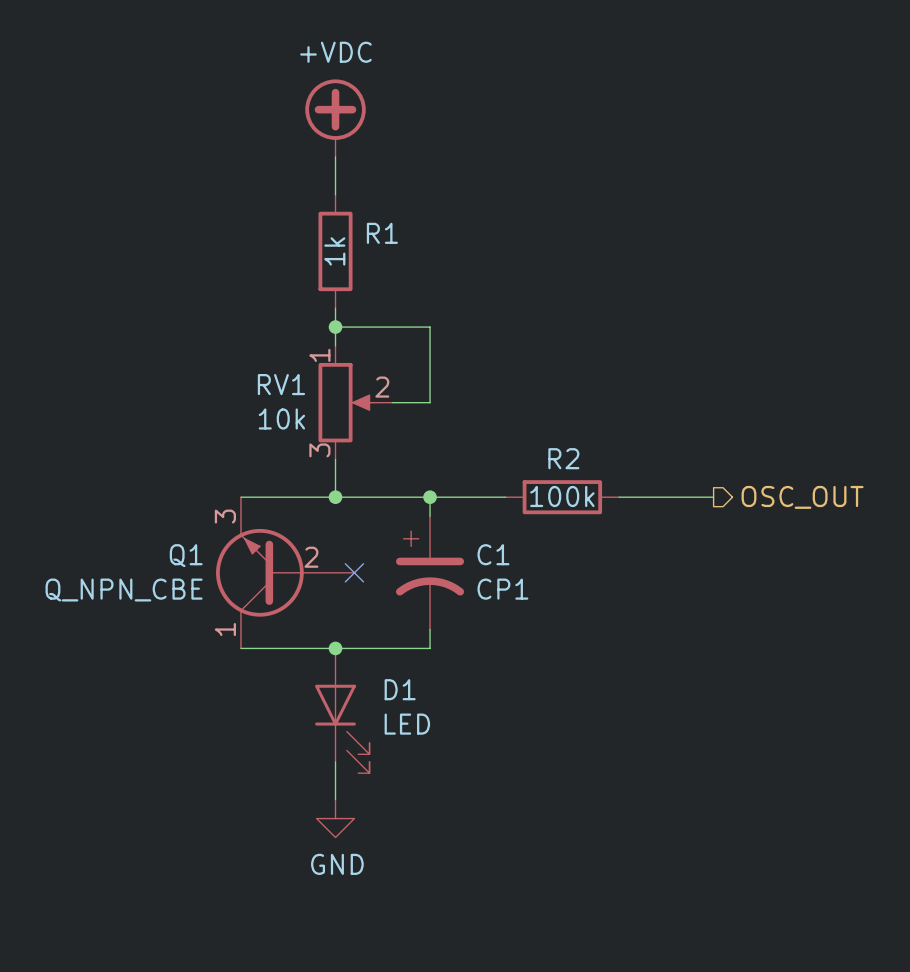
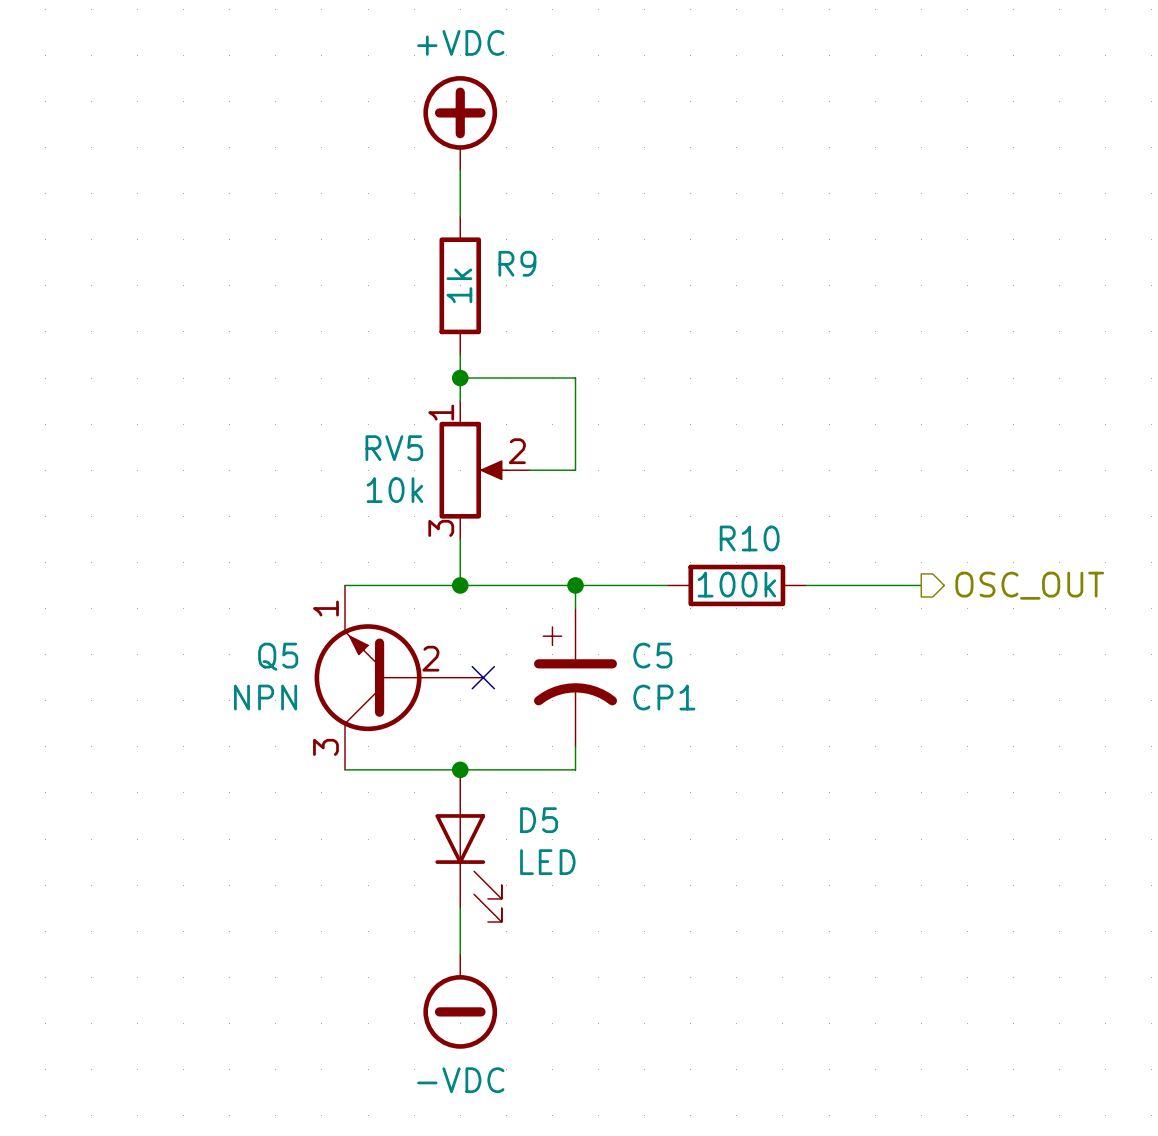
R1 name: R1 (382, 233) -> R9 (517, 263)
RV1 name: RV1 (281, 384) -> RV5 (394, 448)
R2 name: R2 (563, 458) -> R10 (749, 538)
Q1 pin number: 3 (225, 516) -> 1 (325, 608)
C1 name: C1 (493, 554) -> C5 (652, 655)
Q1 name: Q1 (186, 555) -> Q5 (278, 656)
Q1 value: Q_NPN_CBE (124, 590) -> NPN (265, 697)
Q1 pin number: 1 (225, 629) -> 3 (325, 747)
D1 name: D1 (400, 689) -> D5 (539, 820)
power symbol: GND (335, 818) -> none
power symbol: none -> -VDC (460, 1001)

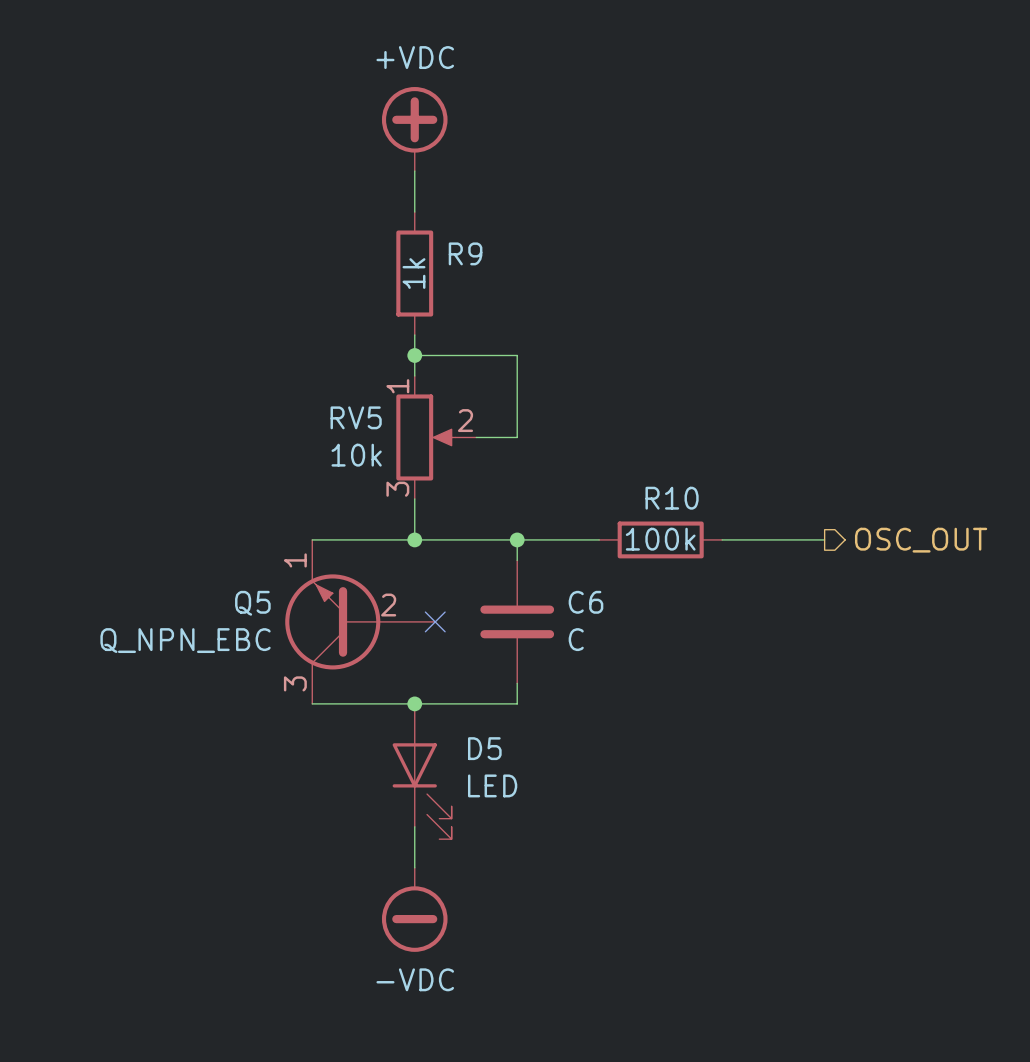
C5: CP1 (575, 677) -> none
C6: none -> C (517, 621)
Q5 value: NPN (265, 697) -> Q_NPN_EBC (185, 640)

